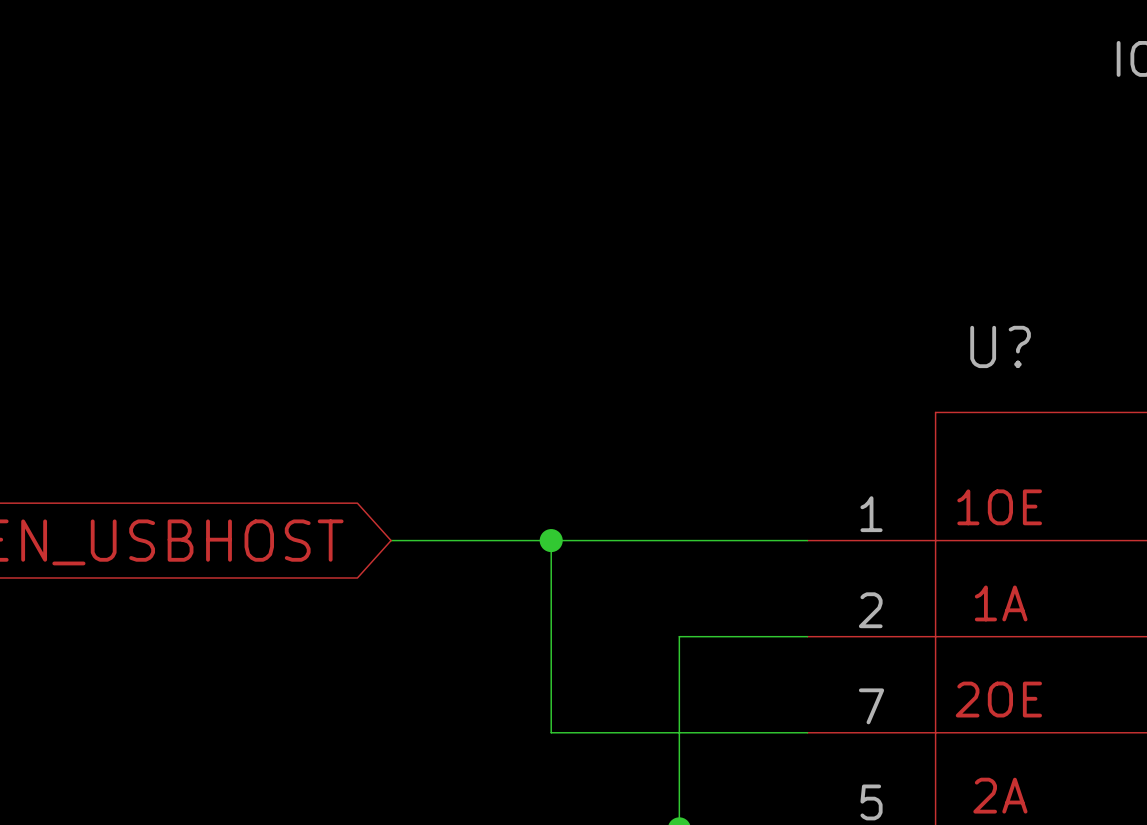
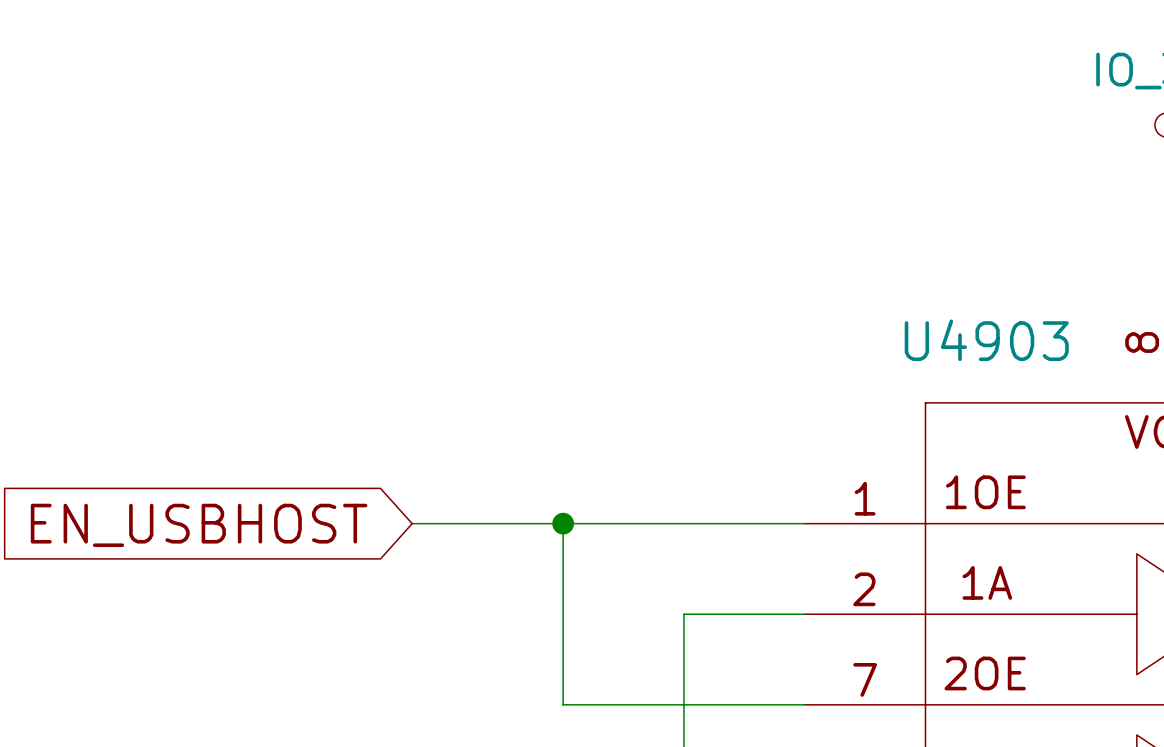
U? name: U? (1000, 346) -> U4903 (986, 340)

